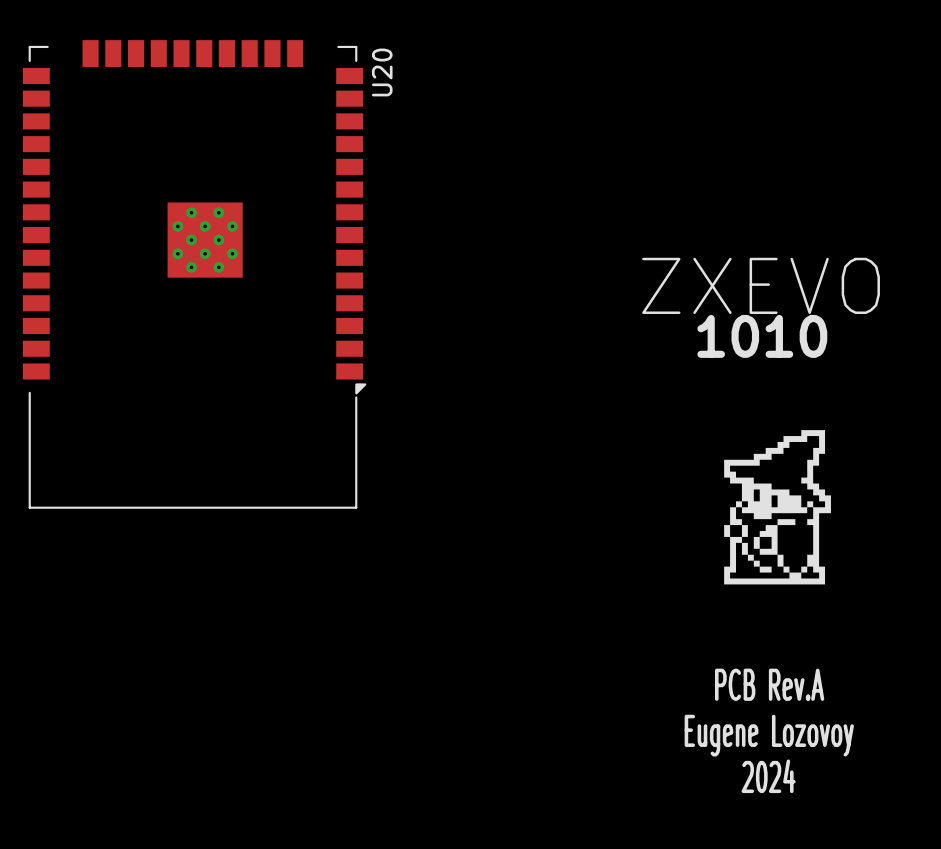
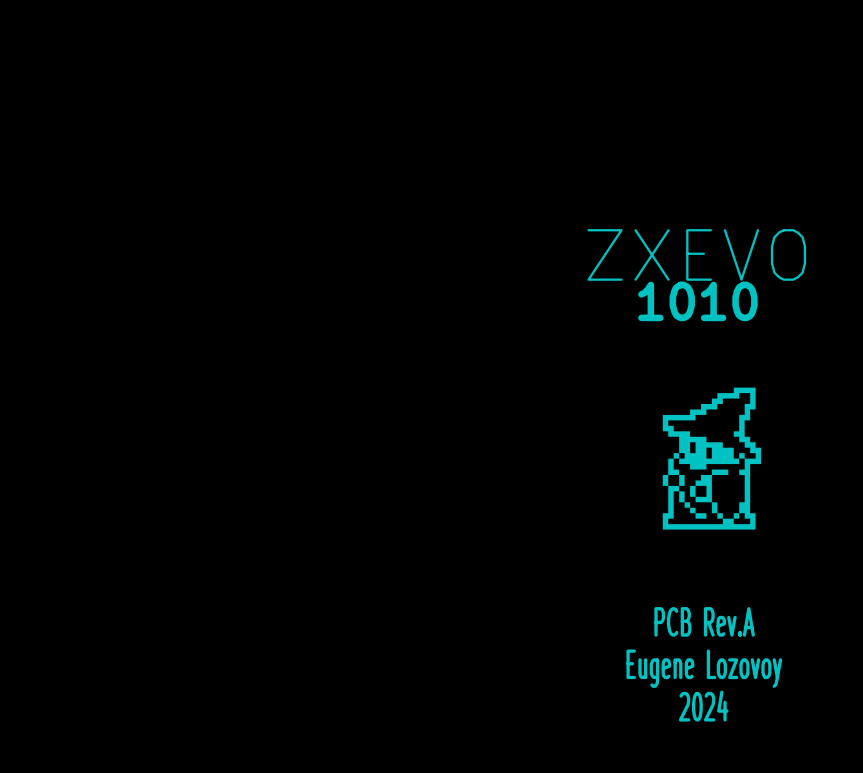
U20: (194, 274) -> none

